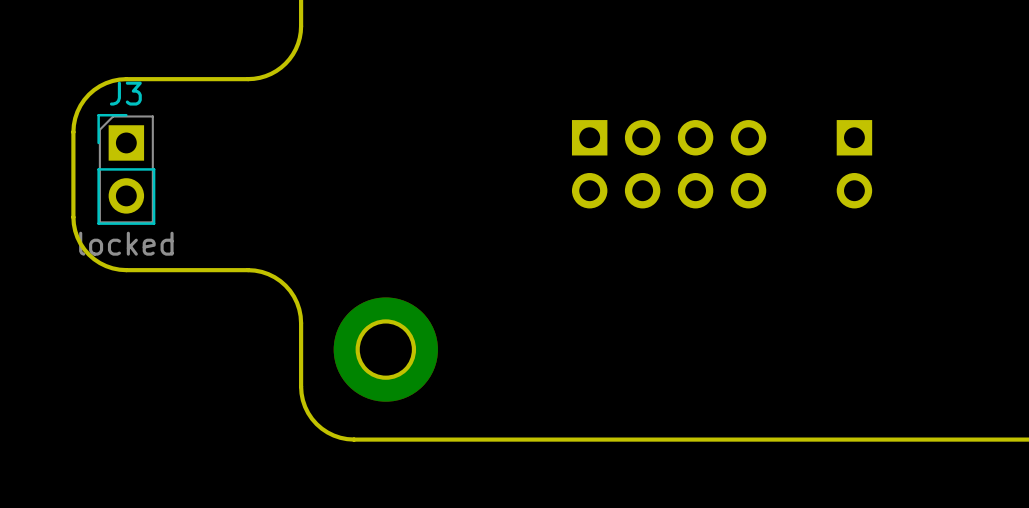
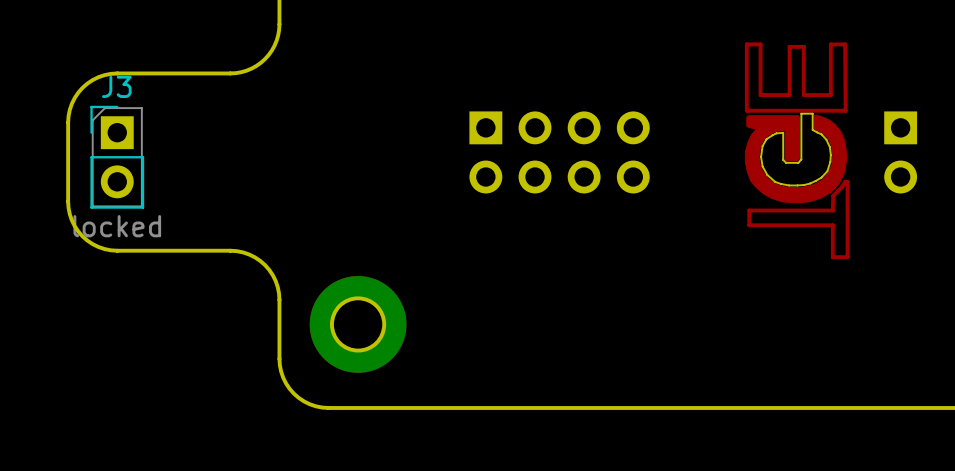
top track: none -> (845, 44) (830, 44) (830, 95) (803, 95) (803, 46) (789, 46) (789, 95) (760, 95) (760, 44) (746, 44) (746, 110) (845, 110) (845, 44)
board edge: none -> (812, 113) (812, 129) (821, 134) (829, 147) (830, 161) (827, 171) (821, 177) (804, 184) (789, 185) (775, 182) (767, 175) (762, 166) (762, 146) (766, 139) (772, 135) (783, 132) (783, 159) (786, 162) (798, 162) (801, 159) (801, 113) (812, 113)
drawing: none -> [744, 114, 848, 204]
part position: (669, 164) -> (559, 152)
part position: (854, 164) -> (900, 152)
top track: none -> (847, 182) (847, 257) (832, 257) (832, 225) (749, 225) (749, 210) (832, 210) (833, 195) (845, 182) (847, 182)

